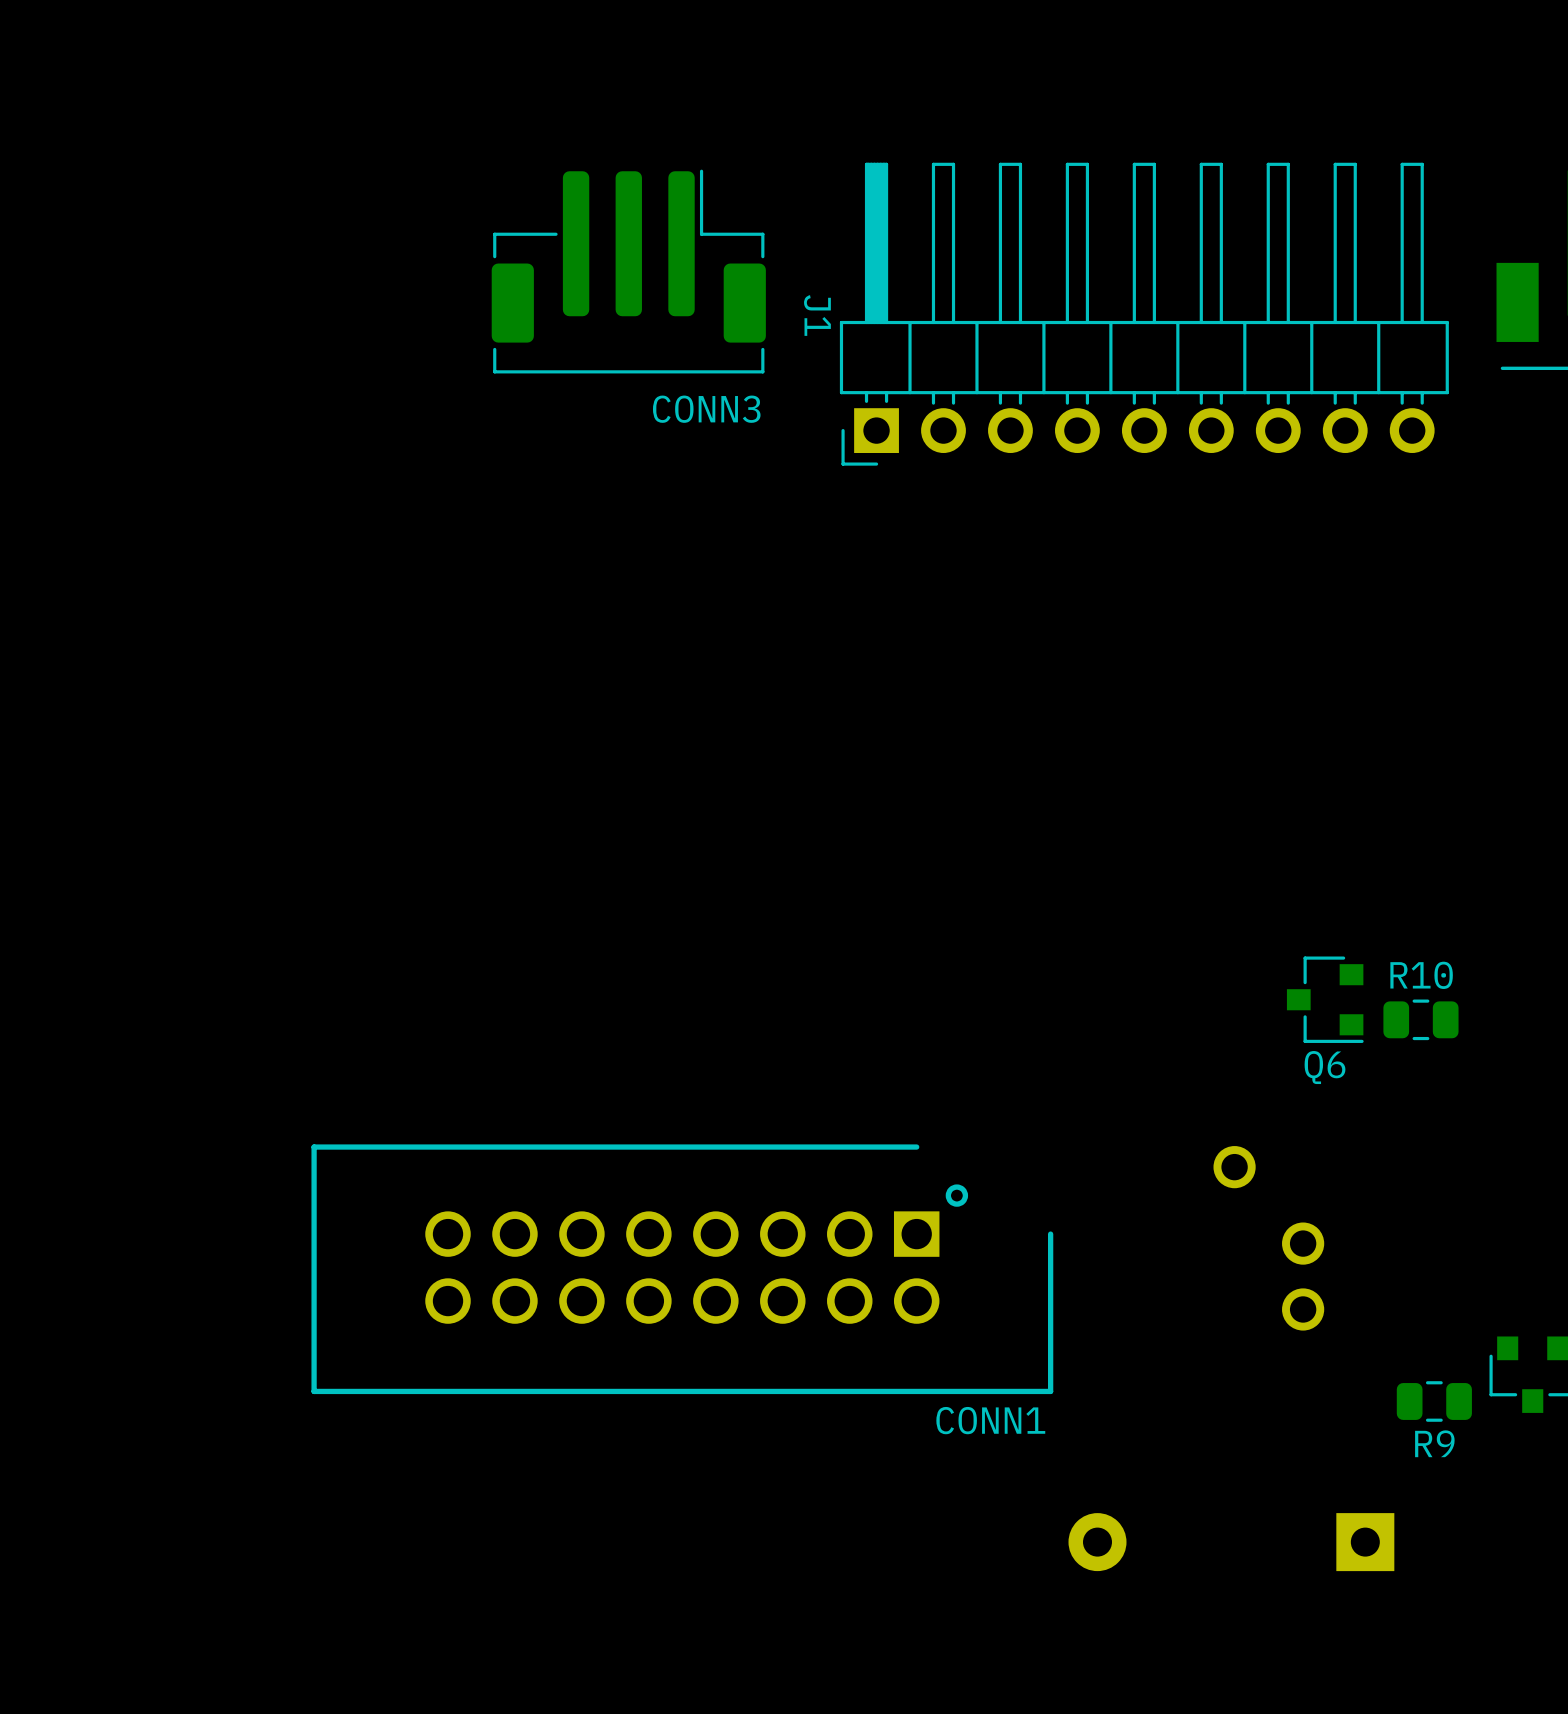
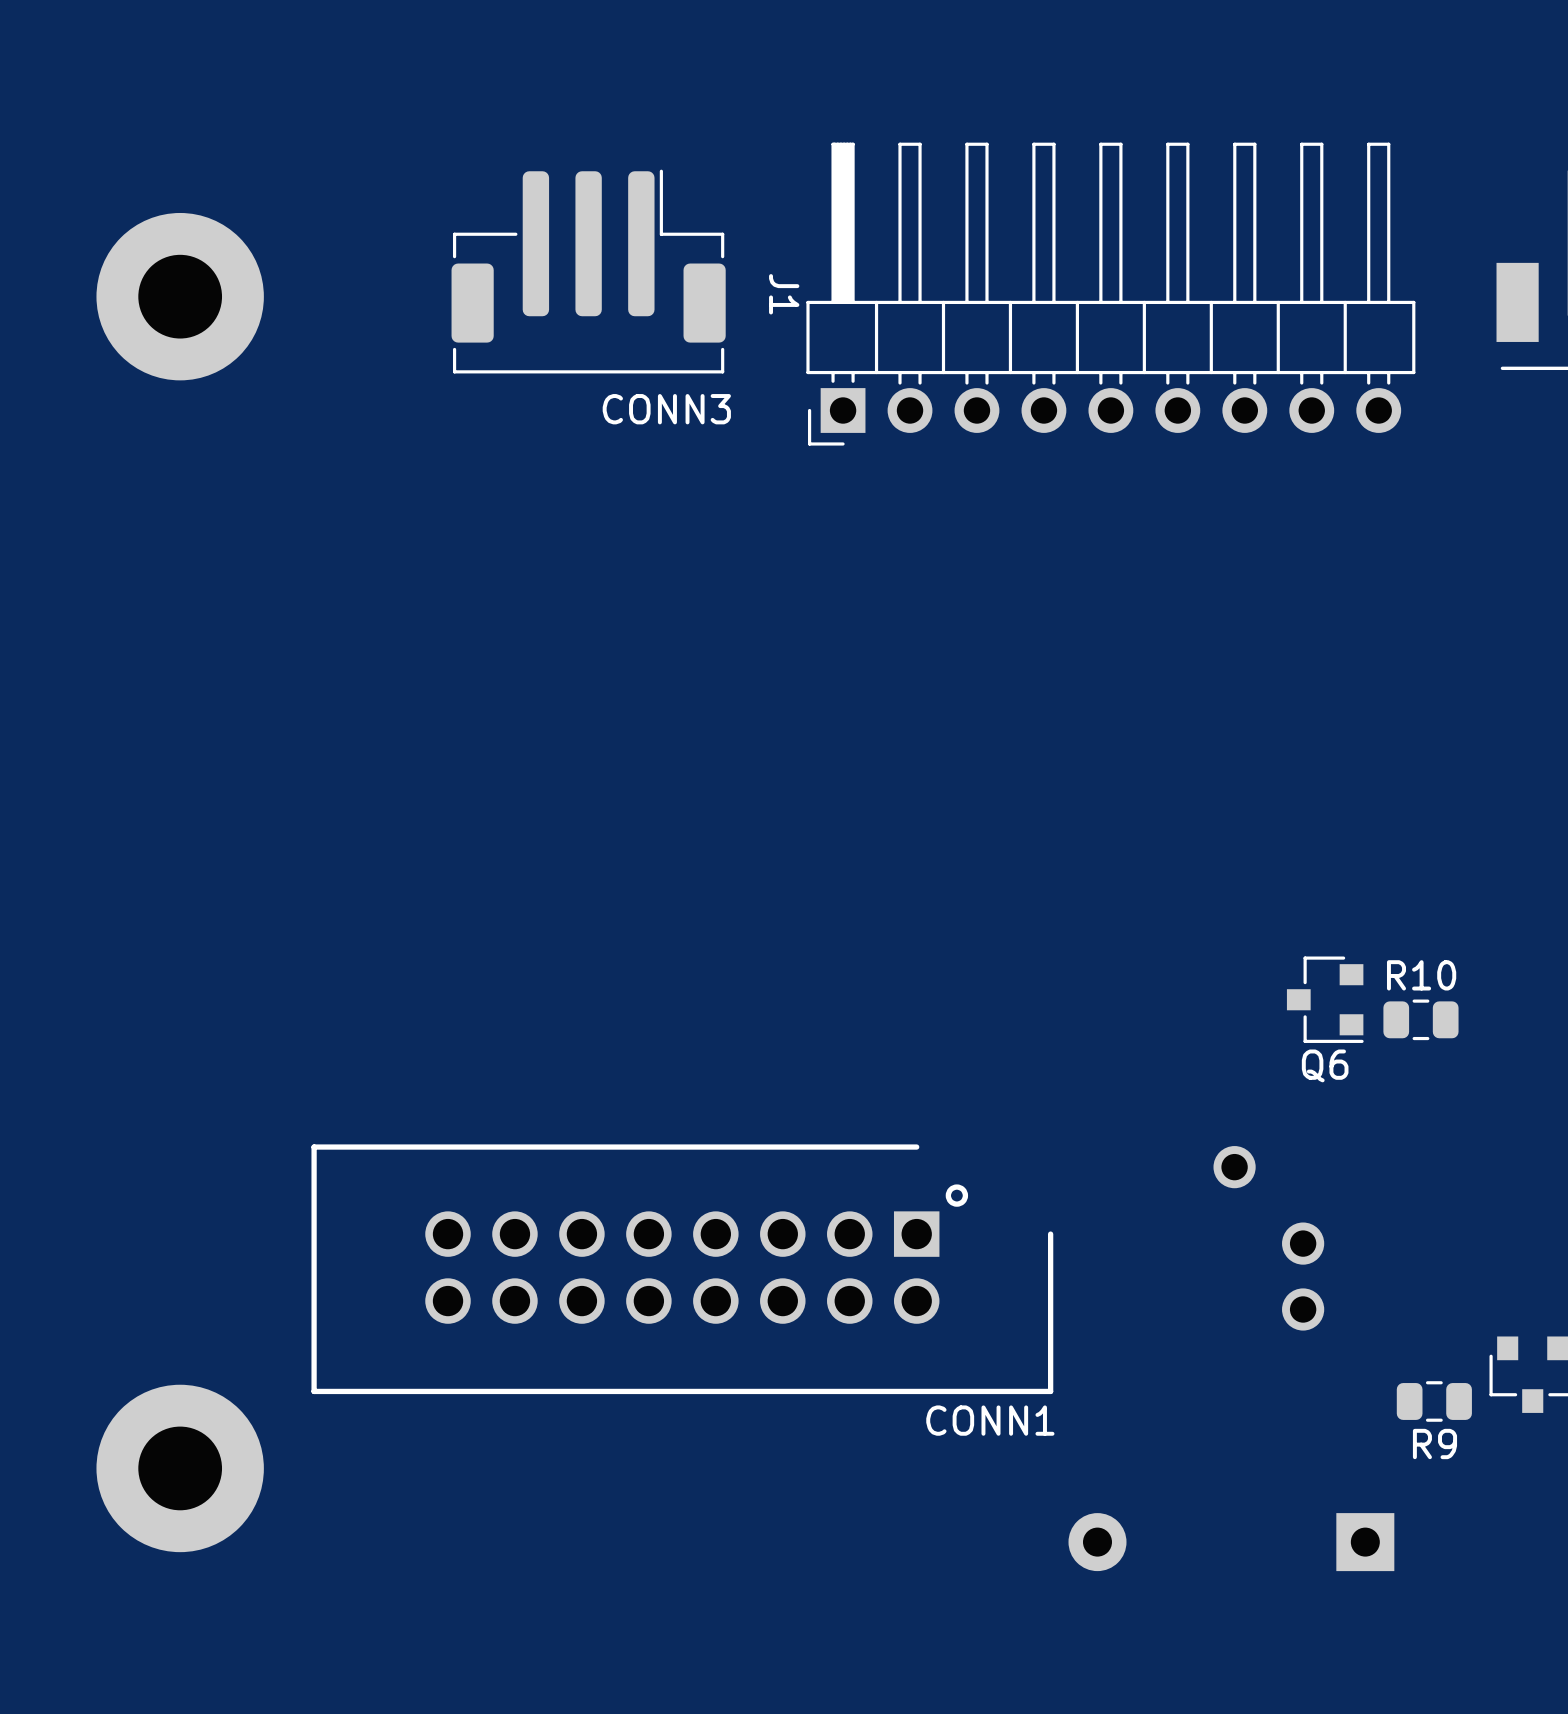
CONN3 position: (628, 271) -> (588, 271)
part: none -> (180, 296)
J1 position: (1144, 314) -> (1110, 294)
part: none -> (180, 1468)

